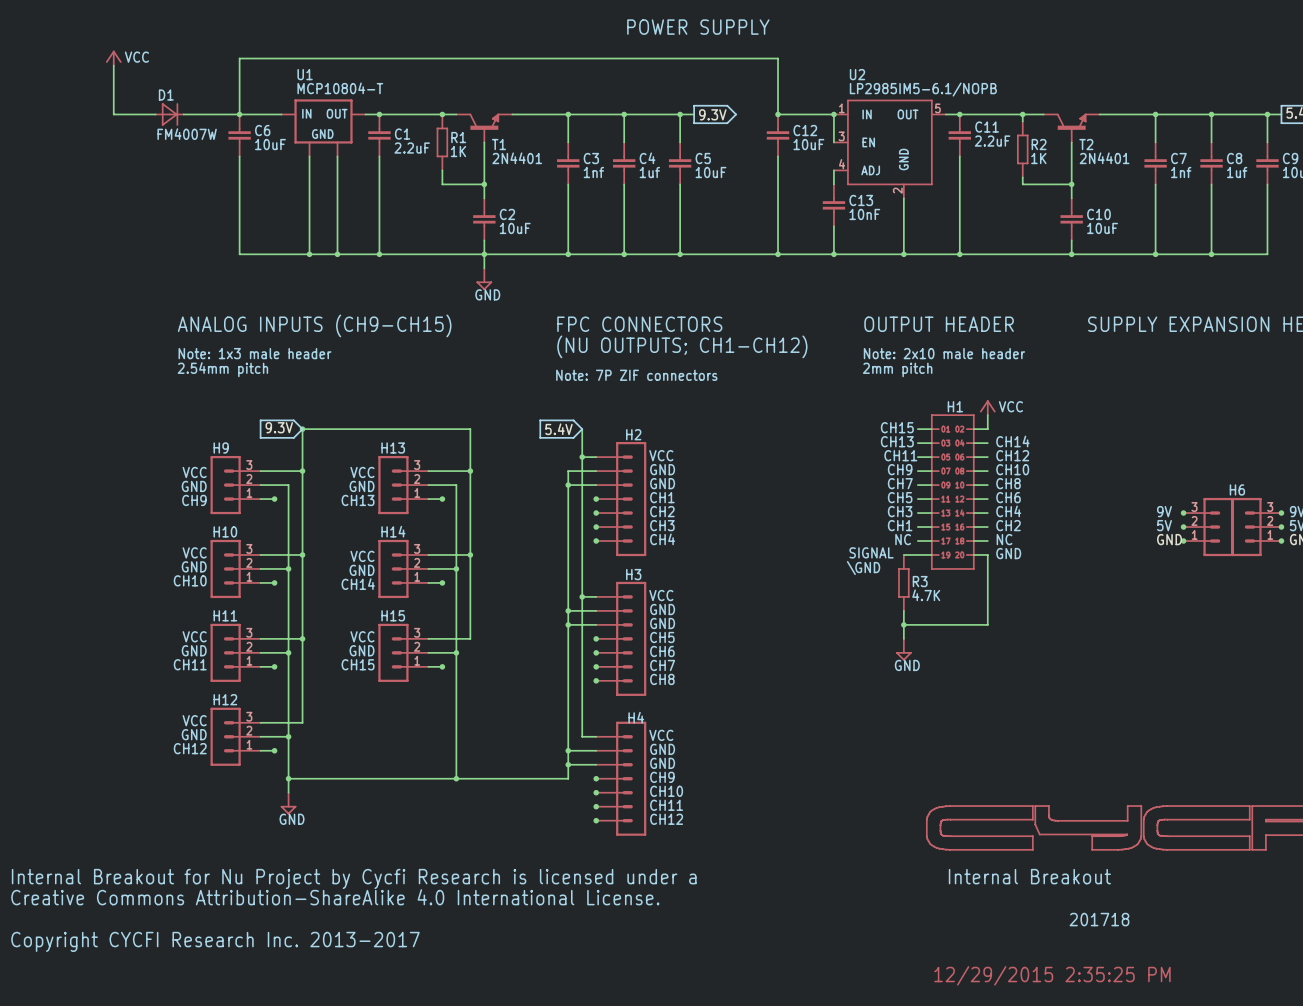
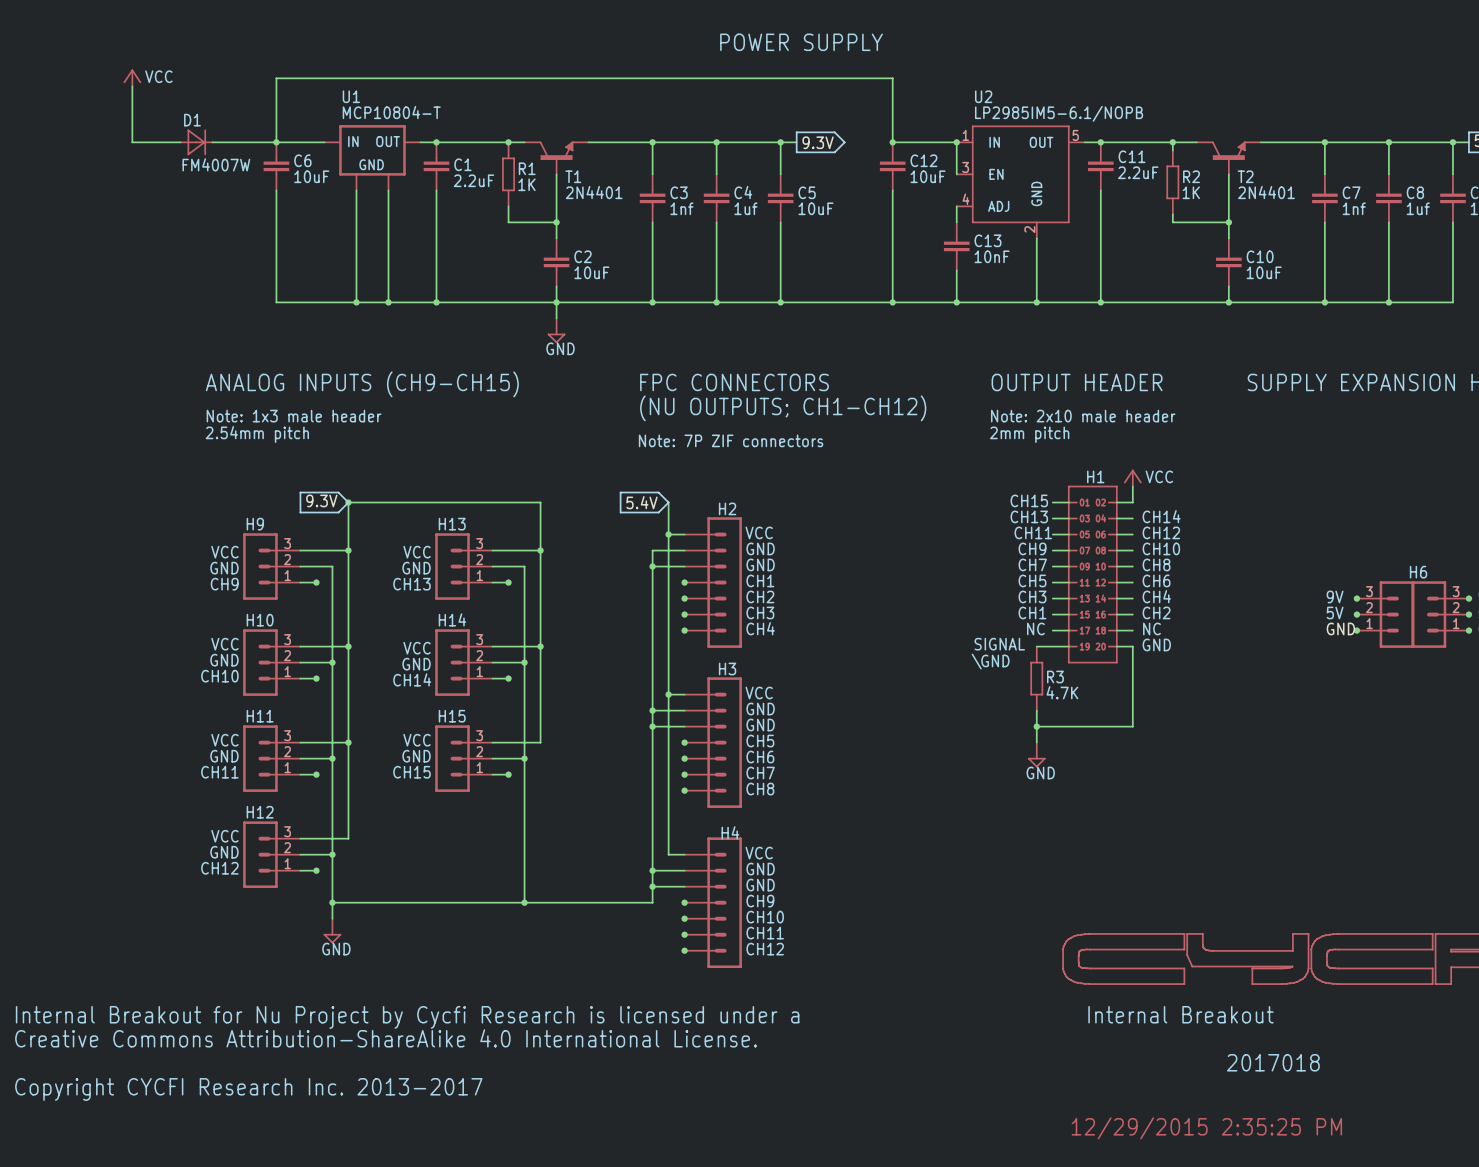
text: 201718 (1099, 919) -> 2017018 (1273, 1062)

